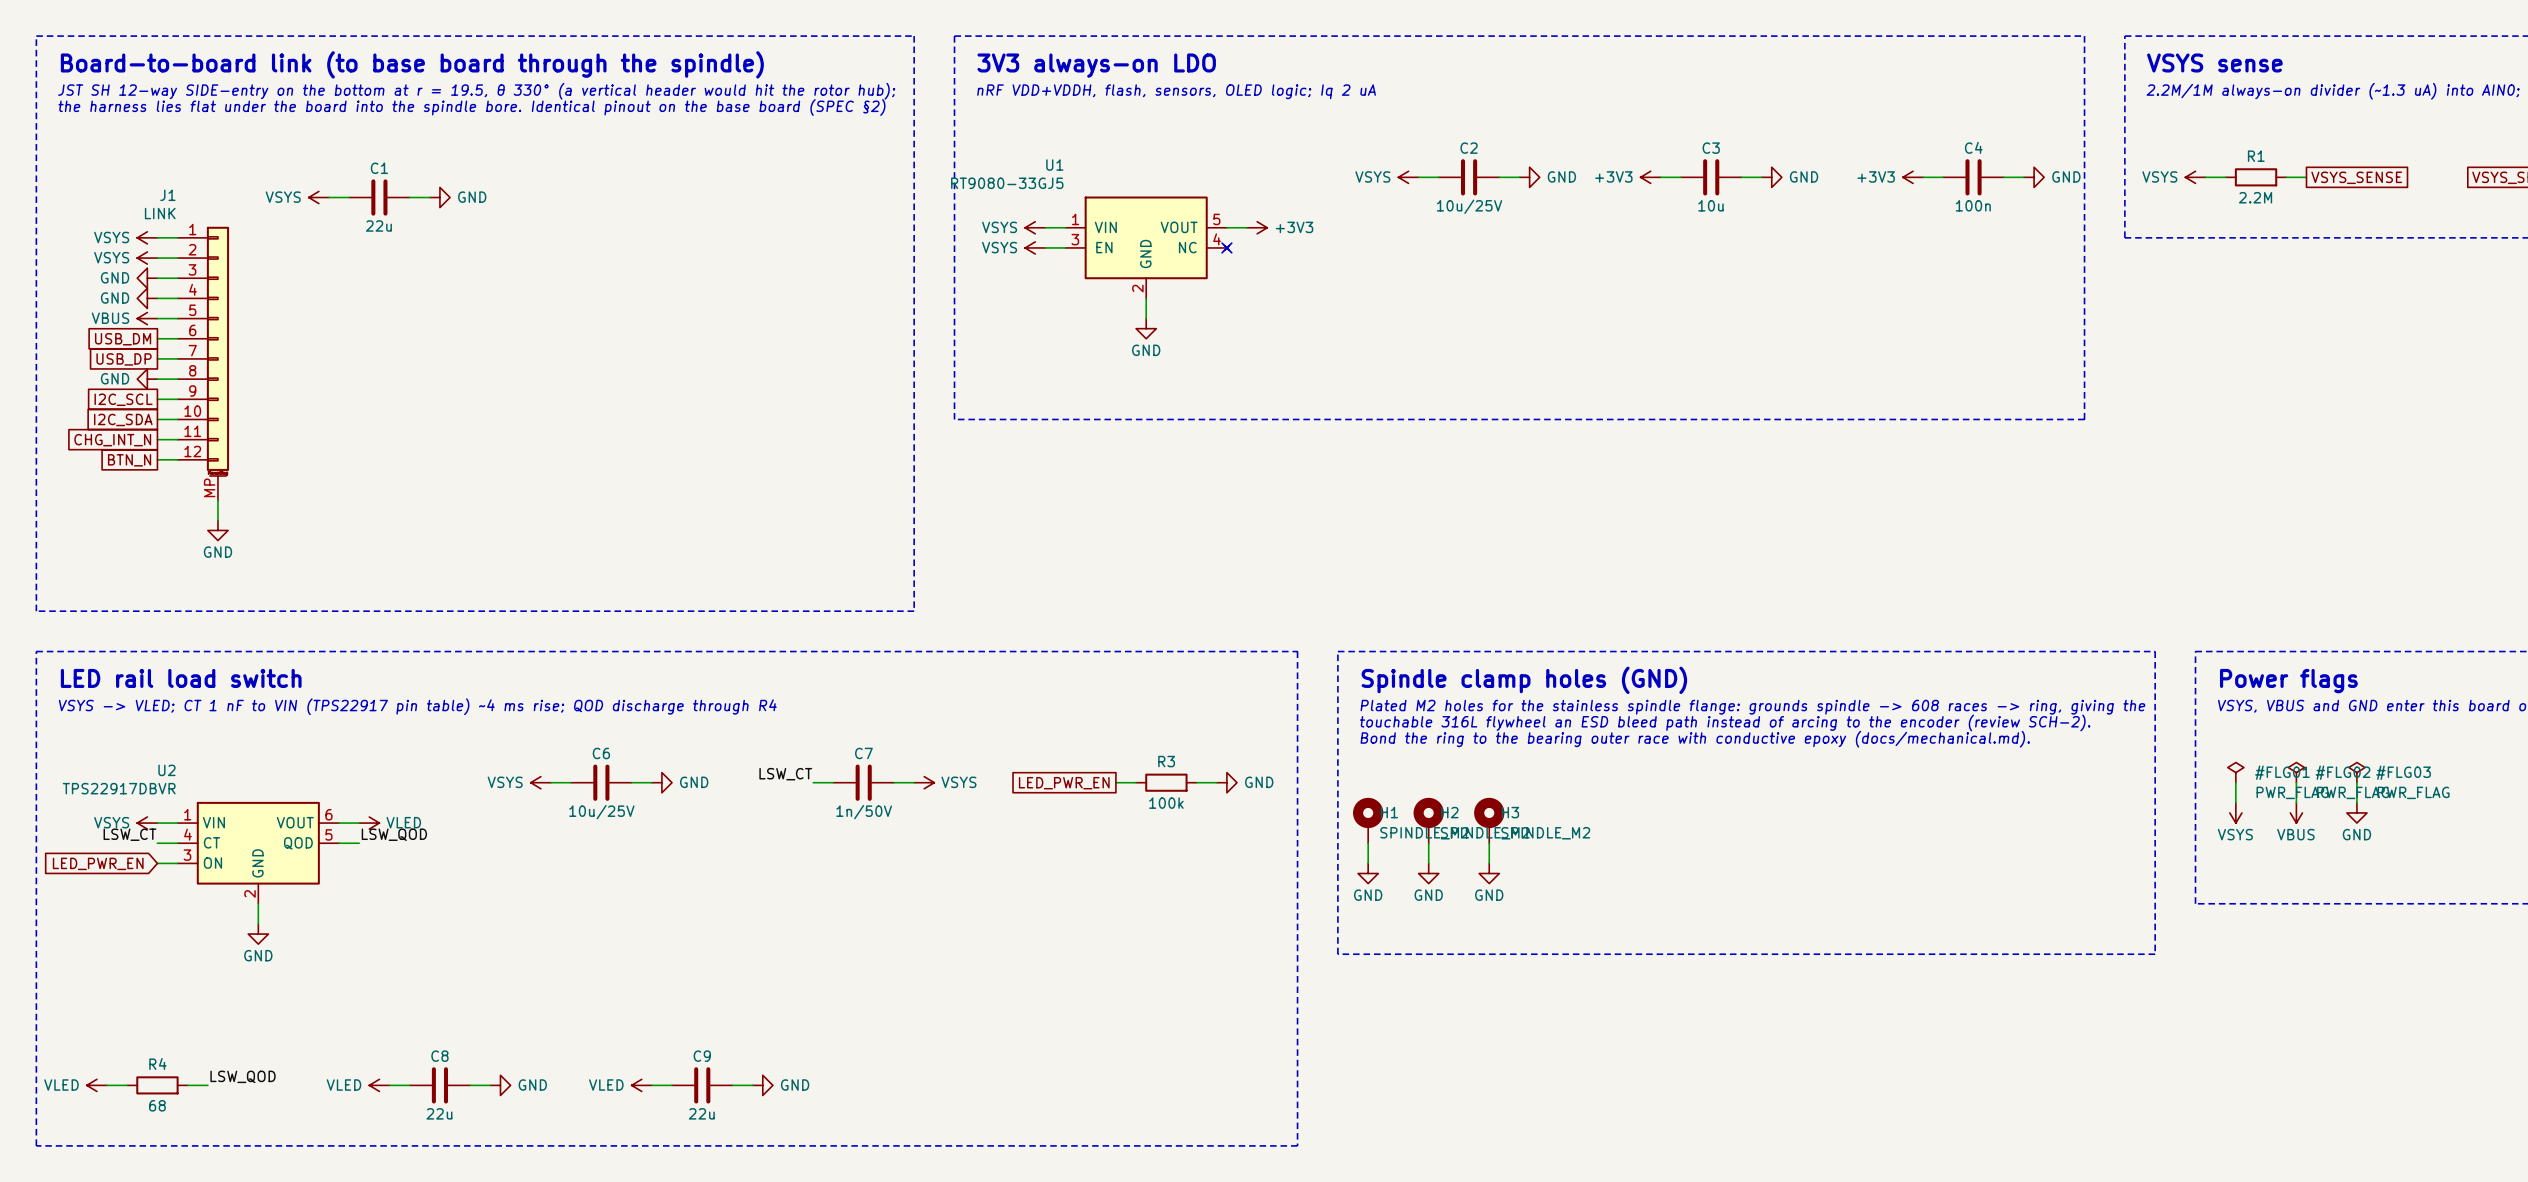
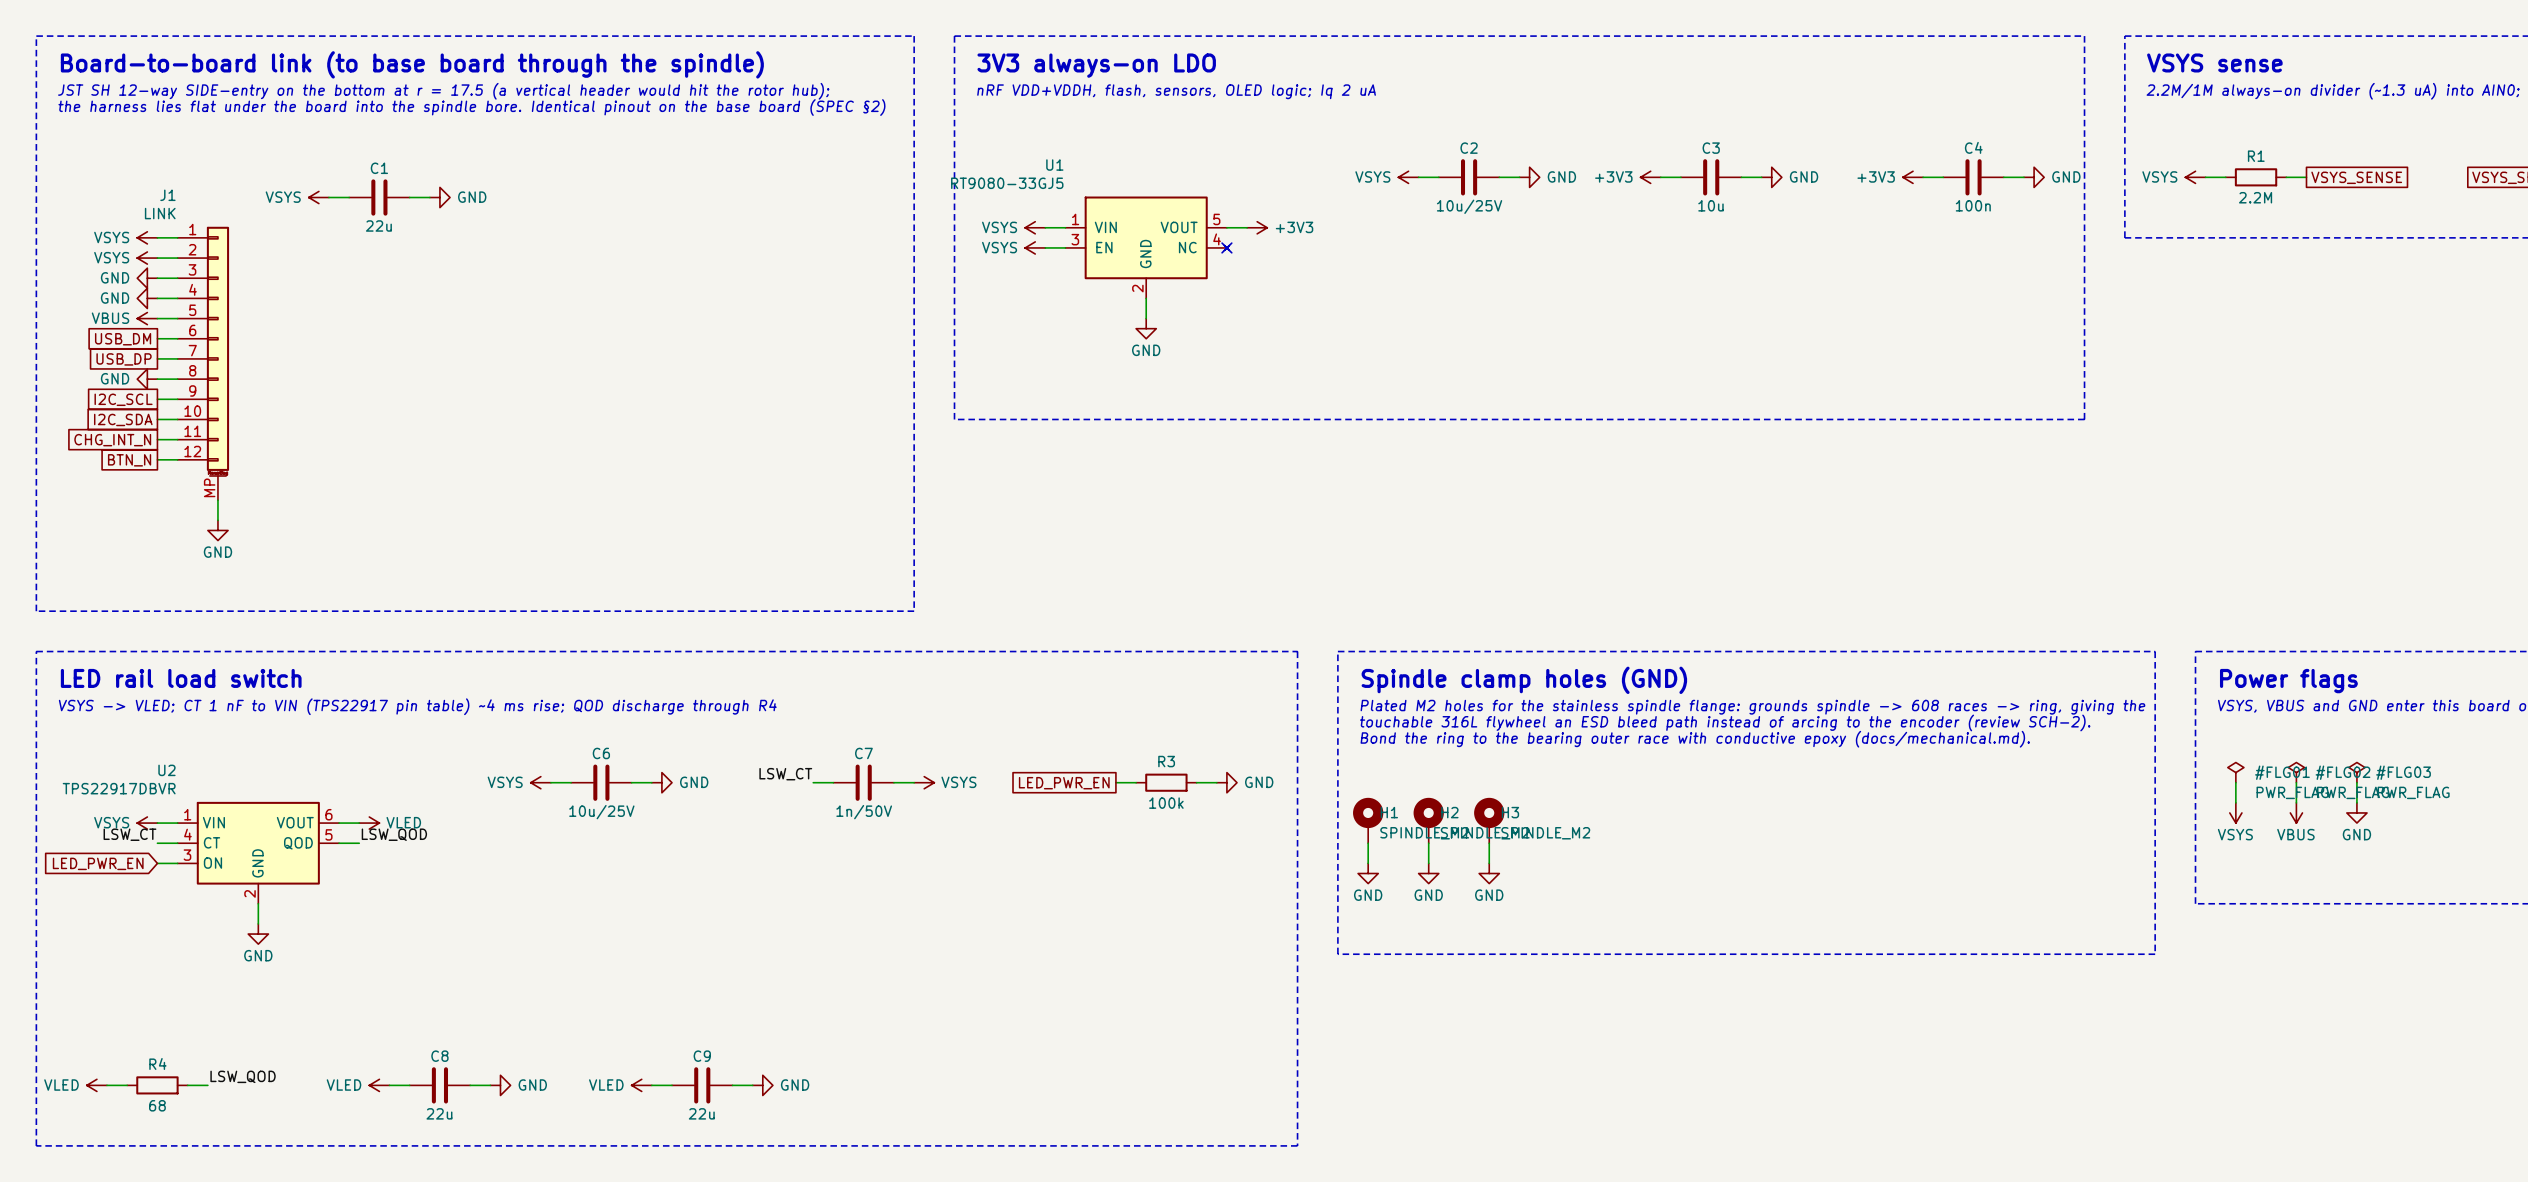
text: JST SH 12-way SIDE-entry on the bottom at r = 19.5, θ 330° (a vertical header would hit the rotor hub); (476, 91) -> JST SH 12-way SIDE-entry on the bottom at r = 17.5 (a vertical header would hit the rotor hub); (443, 91)

